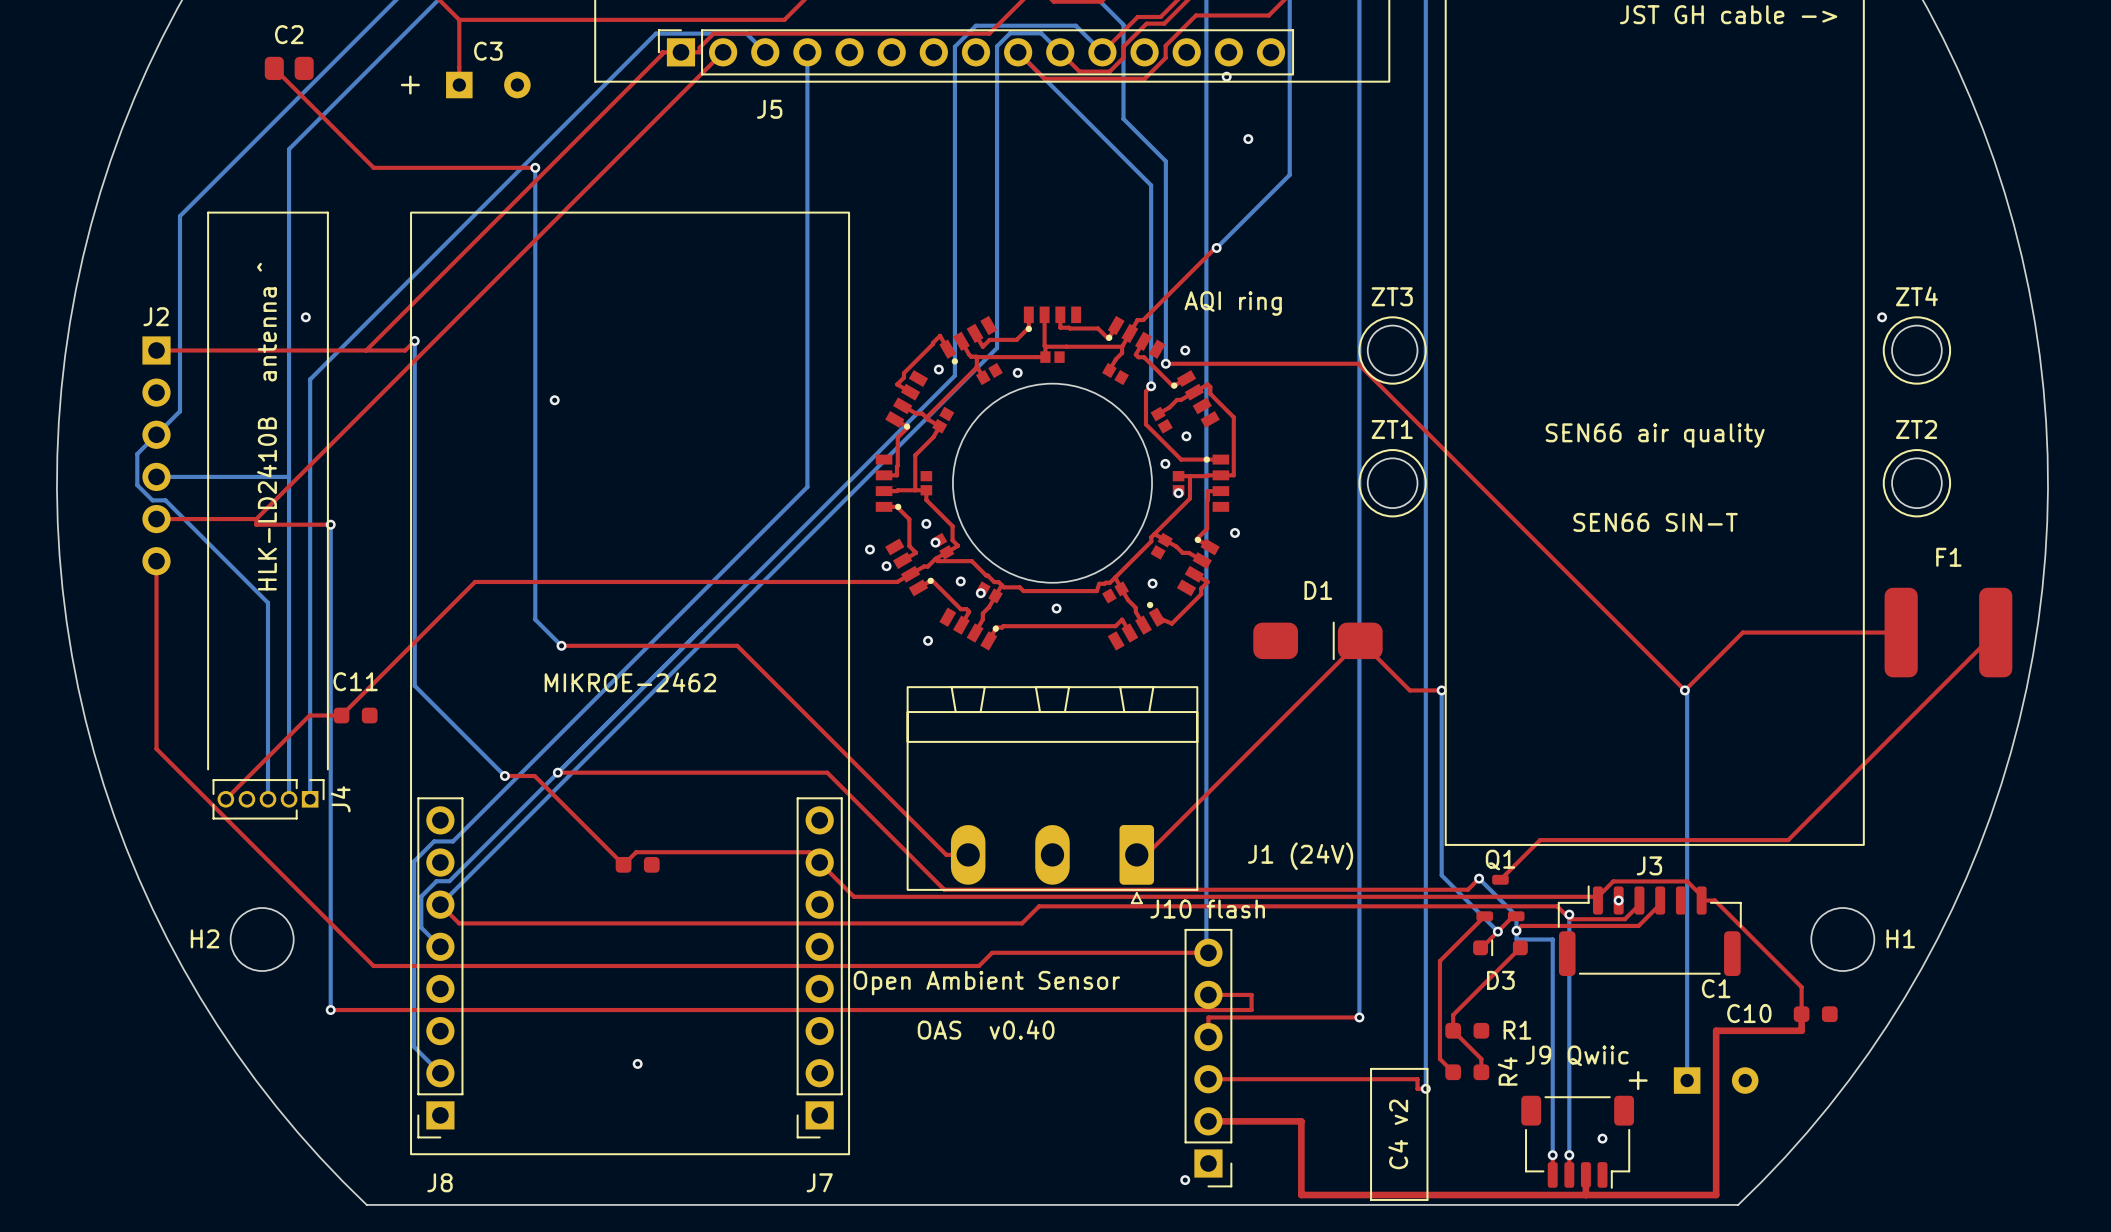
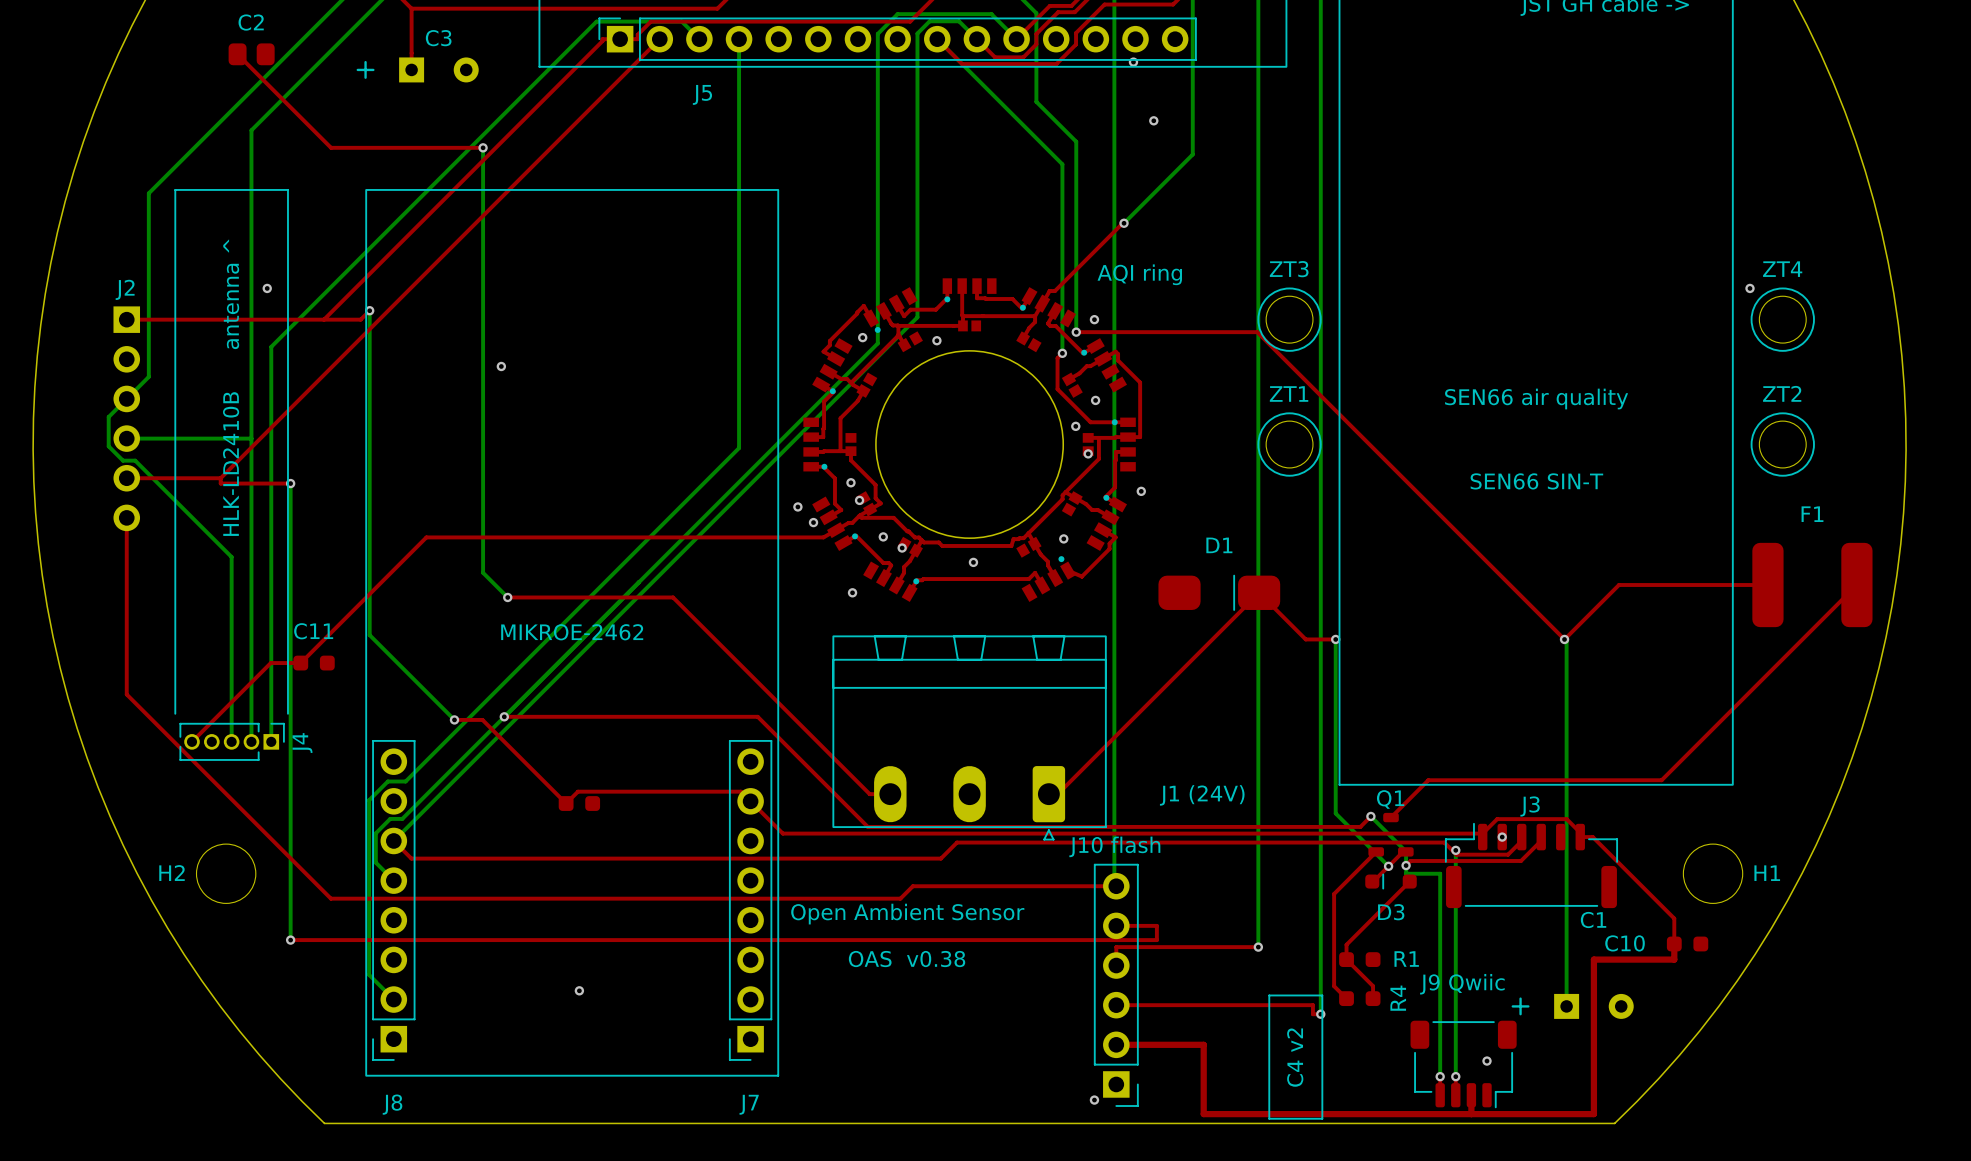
text: OAS v0.40 (986, 1029) -> OAS v0.38 (907, 959)

